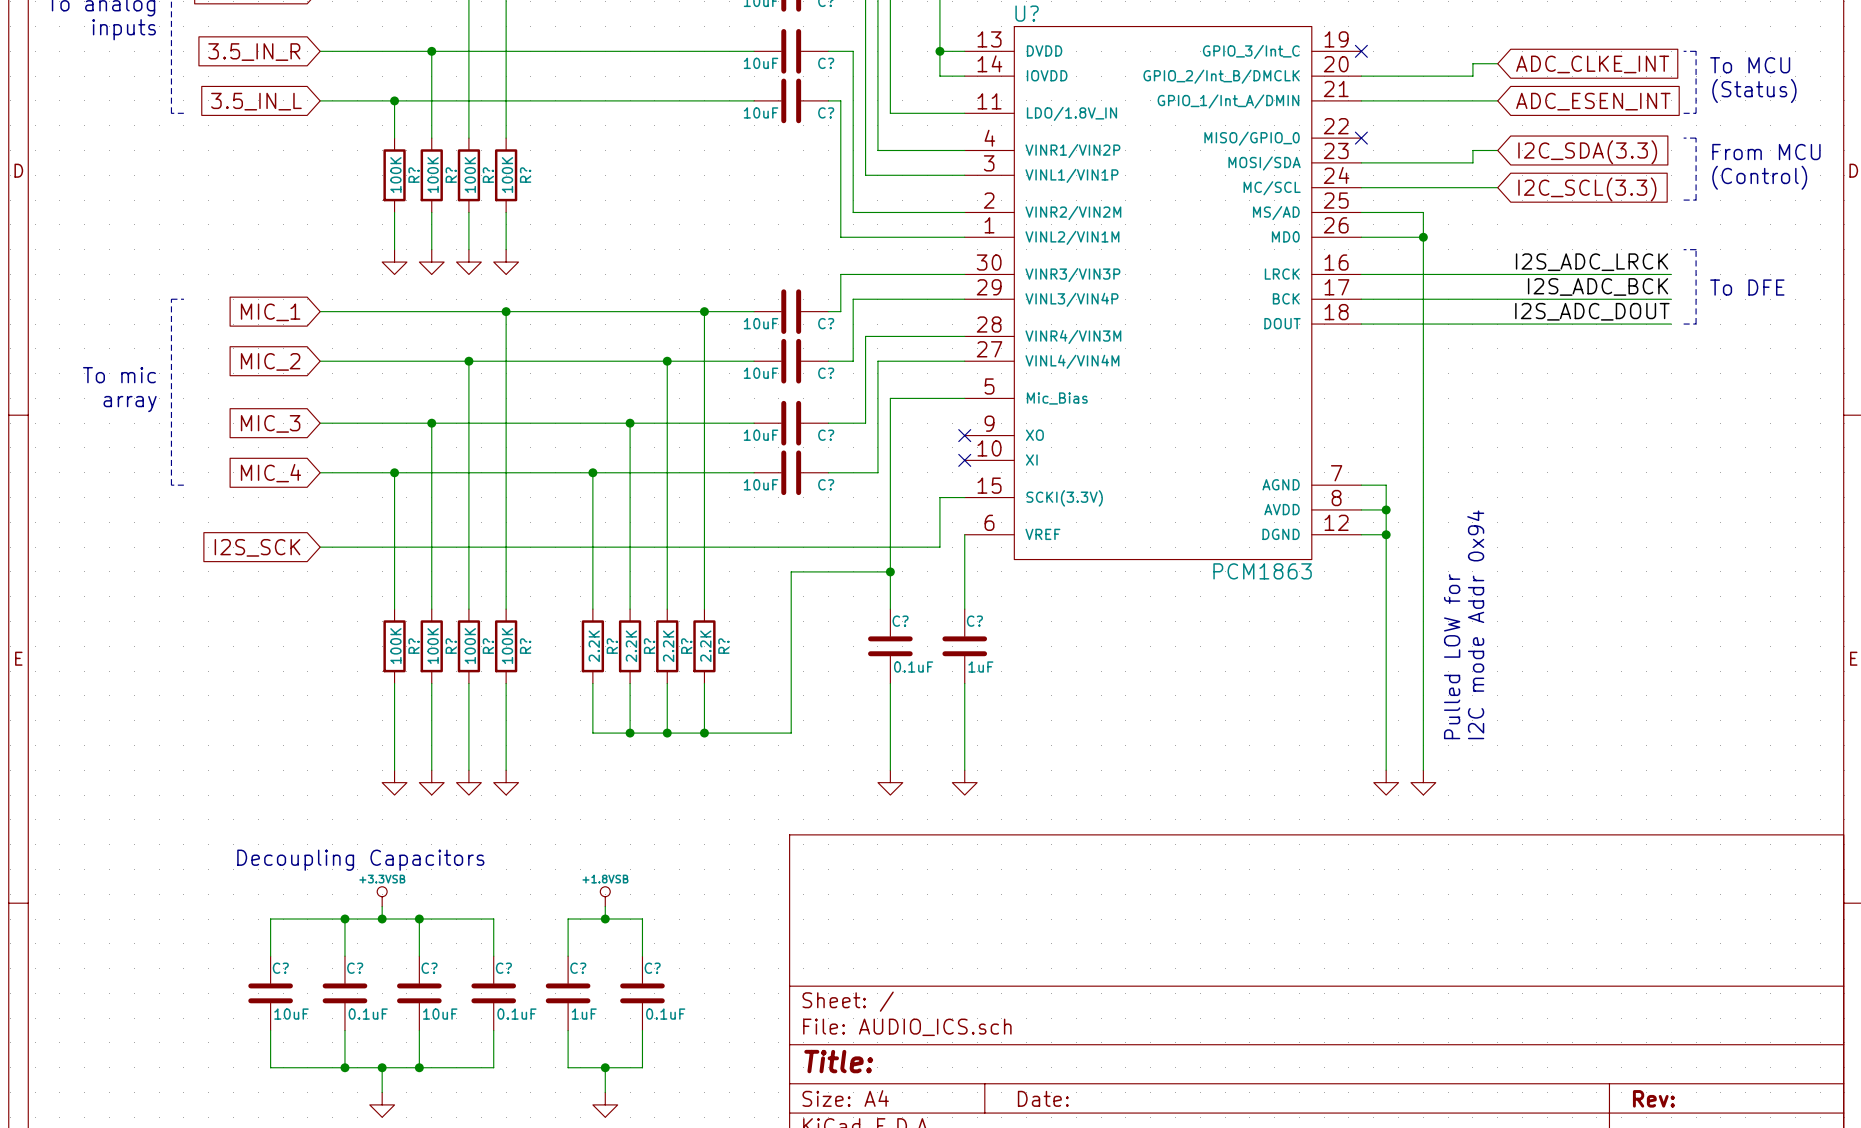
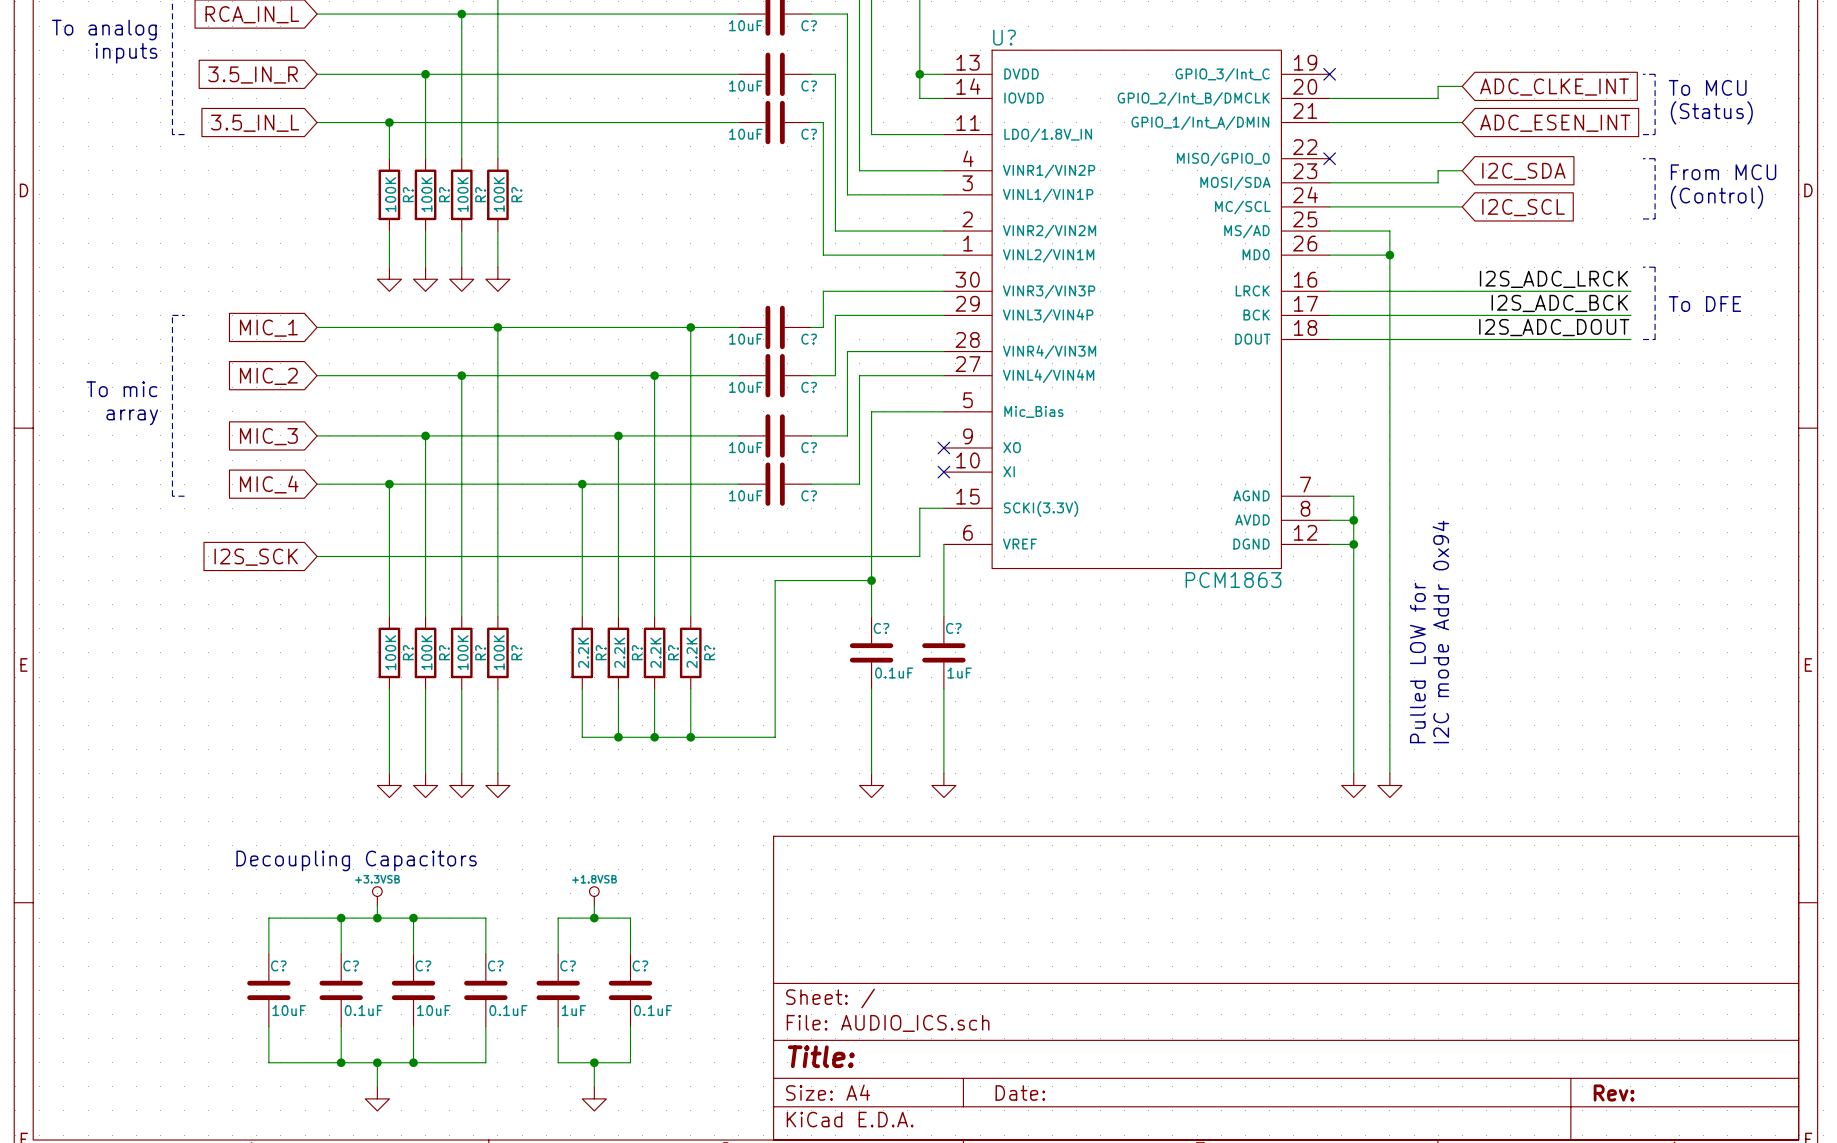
global label: I2C_SDA(3.3) (1587, 152) -> I2C_SDA (1523, 171)
global label: I2C_SCL(3.3) (1587, 189) -> I2C_SCL (1523, 207)

